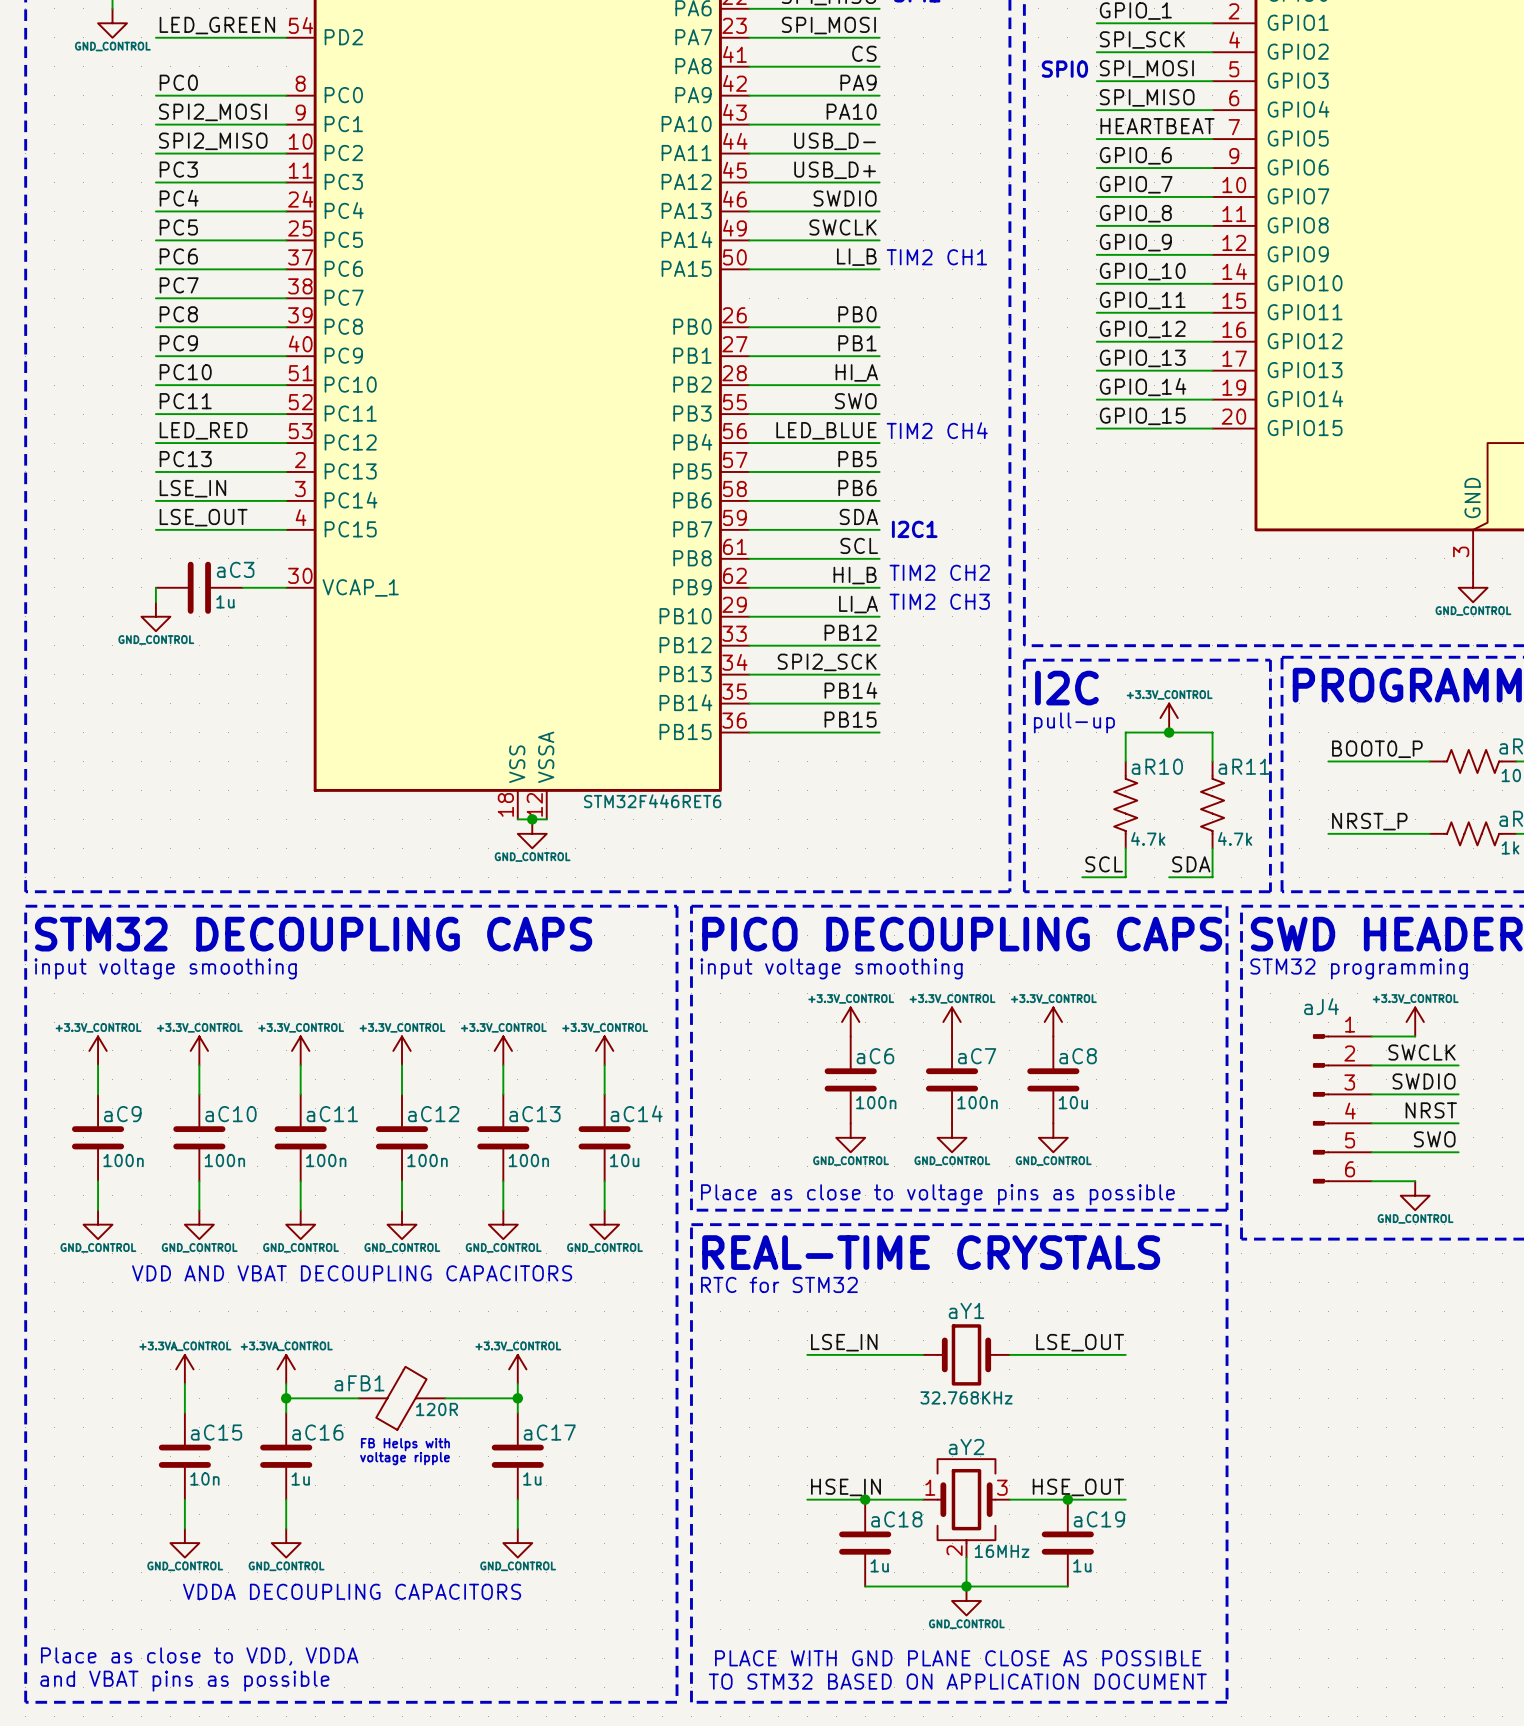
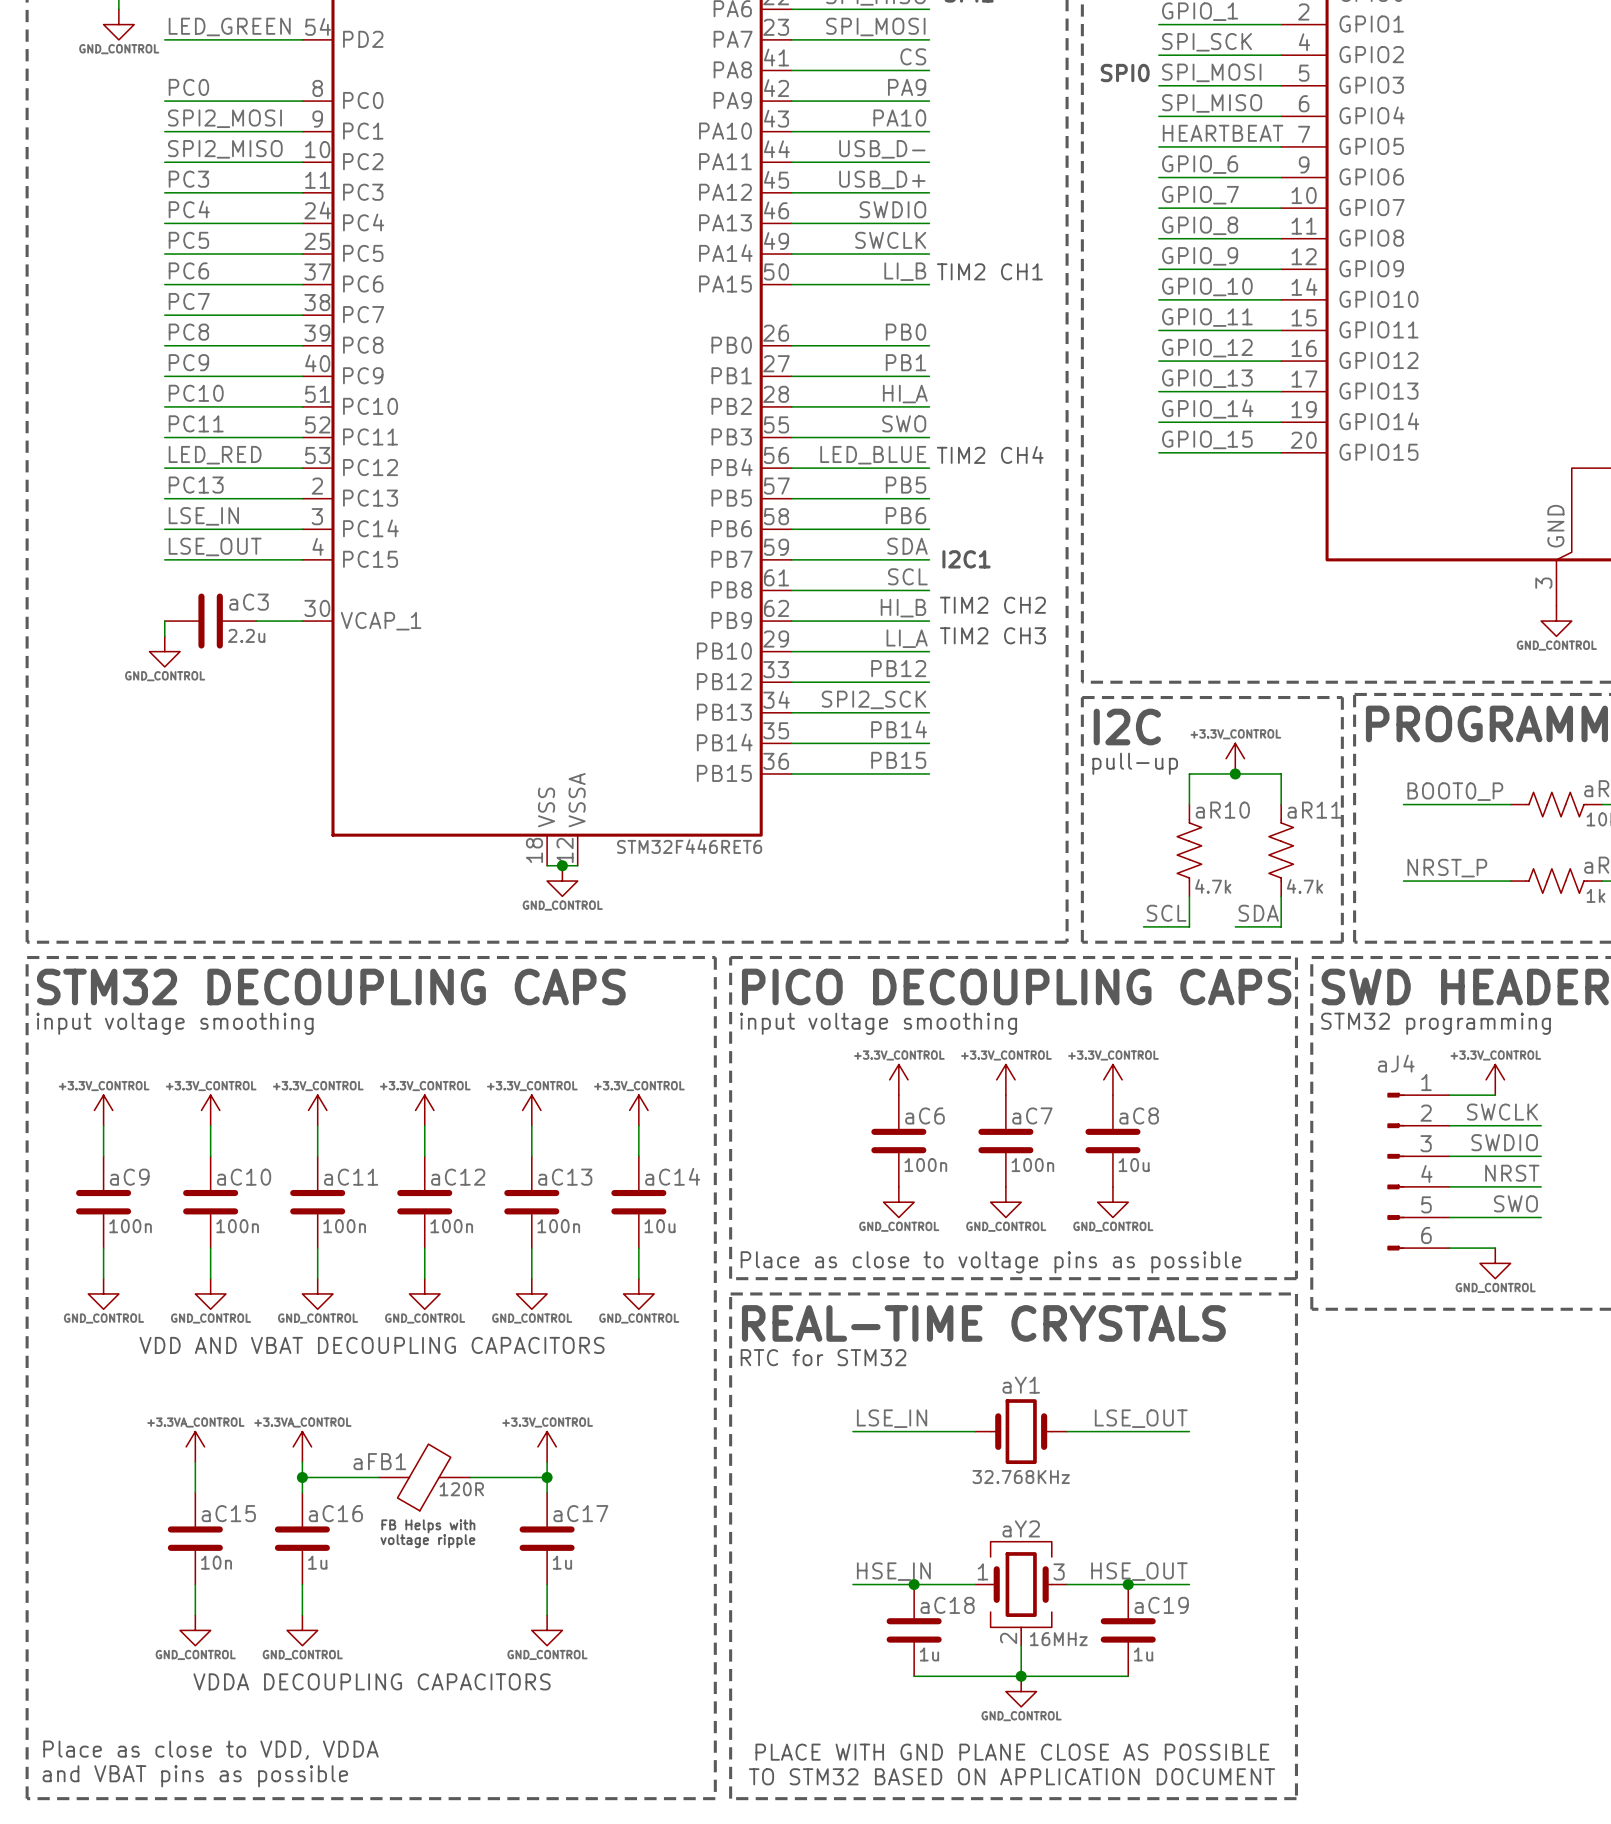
aC3 value: 1u (225, 601) -> 2.2u (246, 635)

